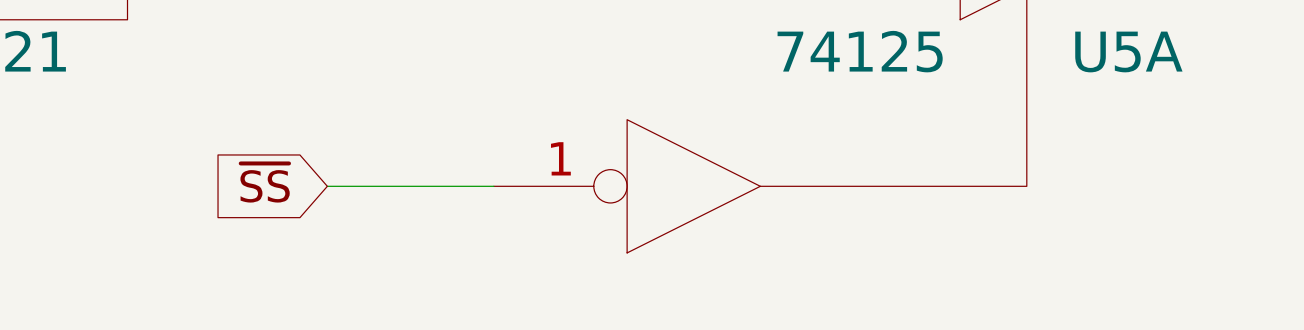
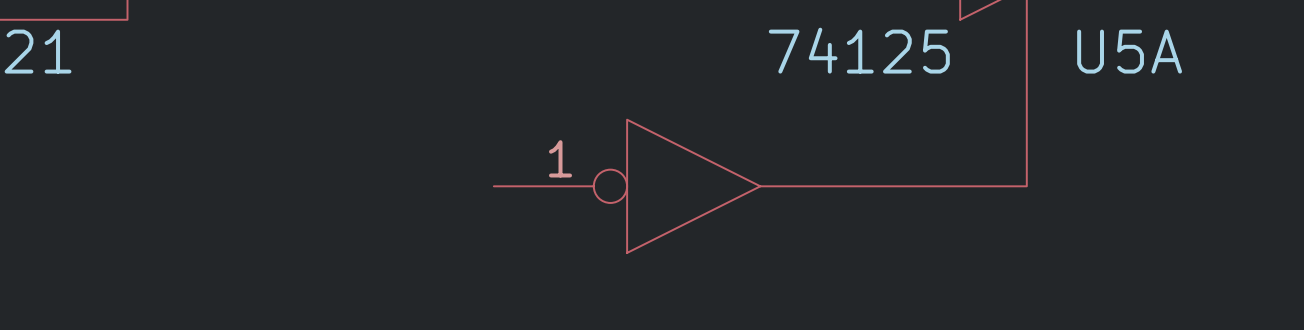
global label: ~{SS} (265, 183) -> none
wire: (327, 186) (493, 186) -> none

